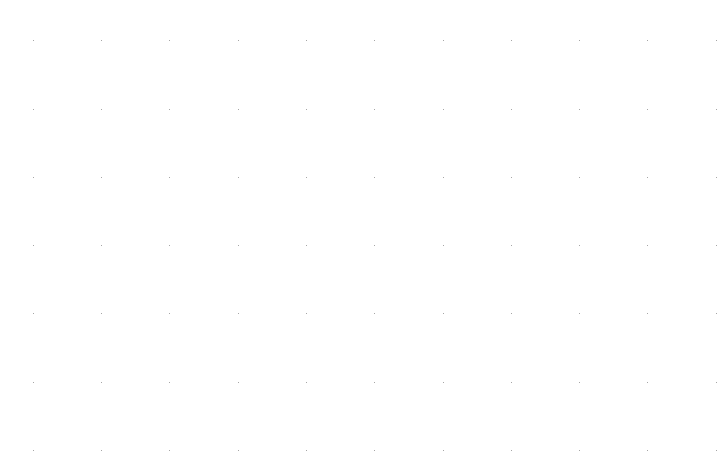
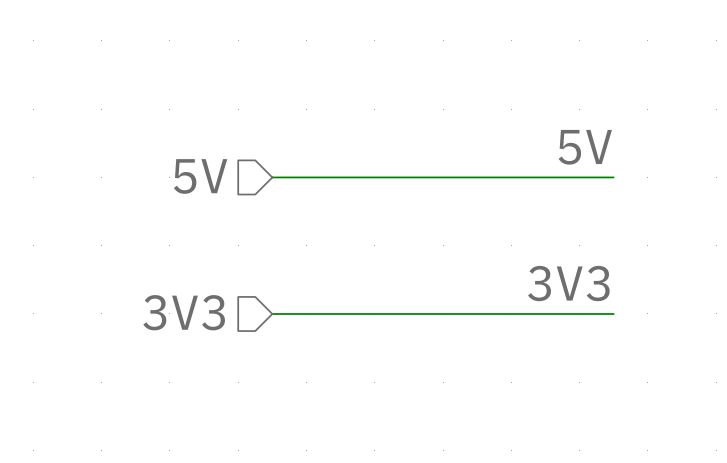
label: none -> 5V (585, 147)
hierarchical label: none -> 5V (200, 176)
wire: none -> (272, 177) (613, 177)
label: none -> 3V3 (568, 283)
hierarchical label: none -> 3V3 (184, 312)
wire: none -> (272, 313) (613, 313)

